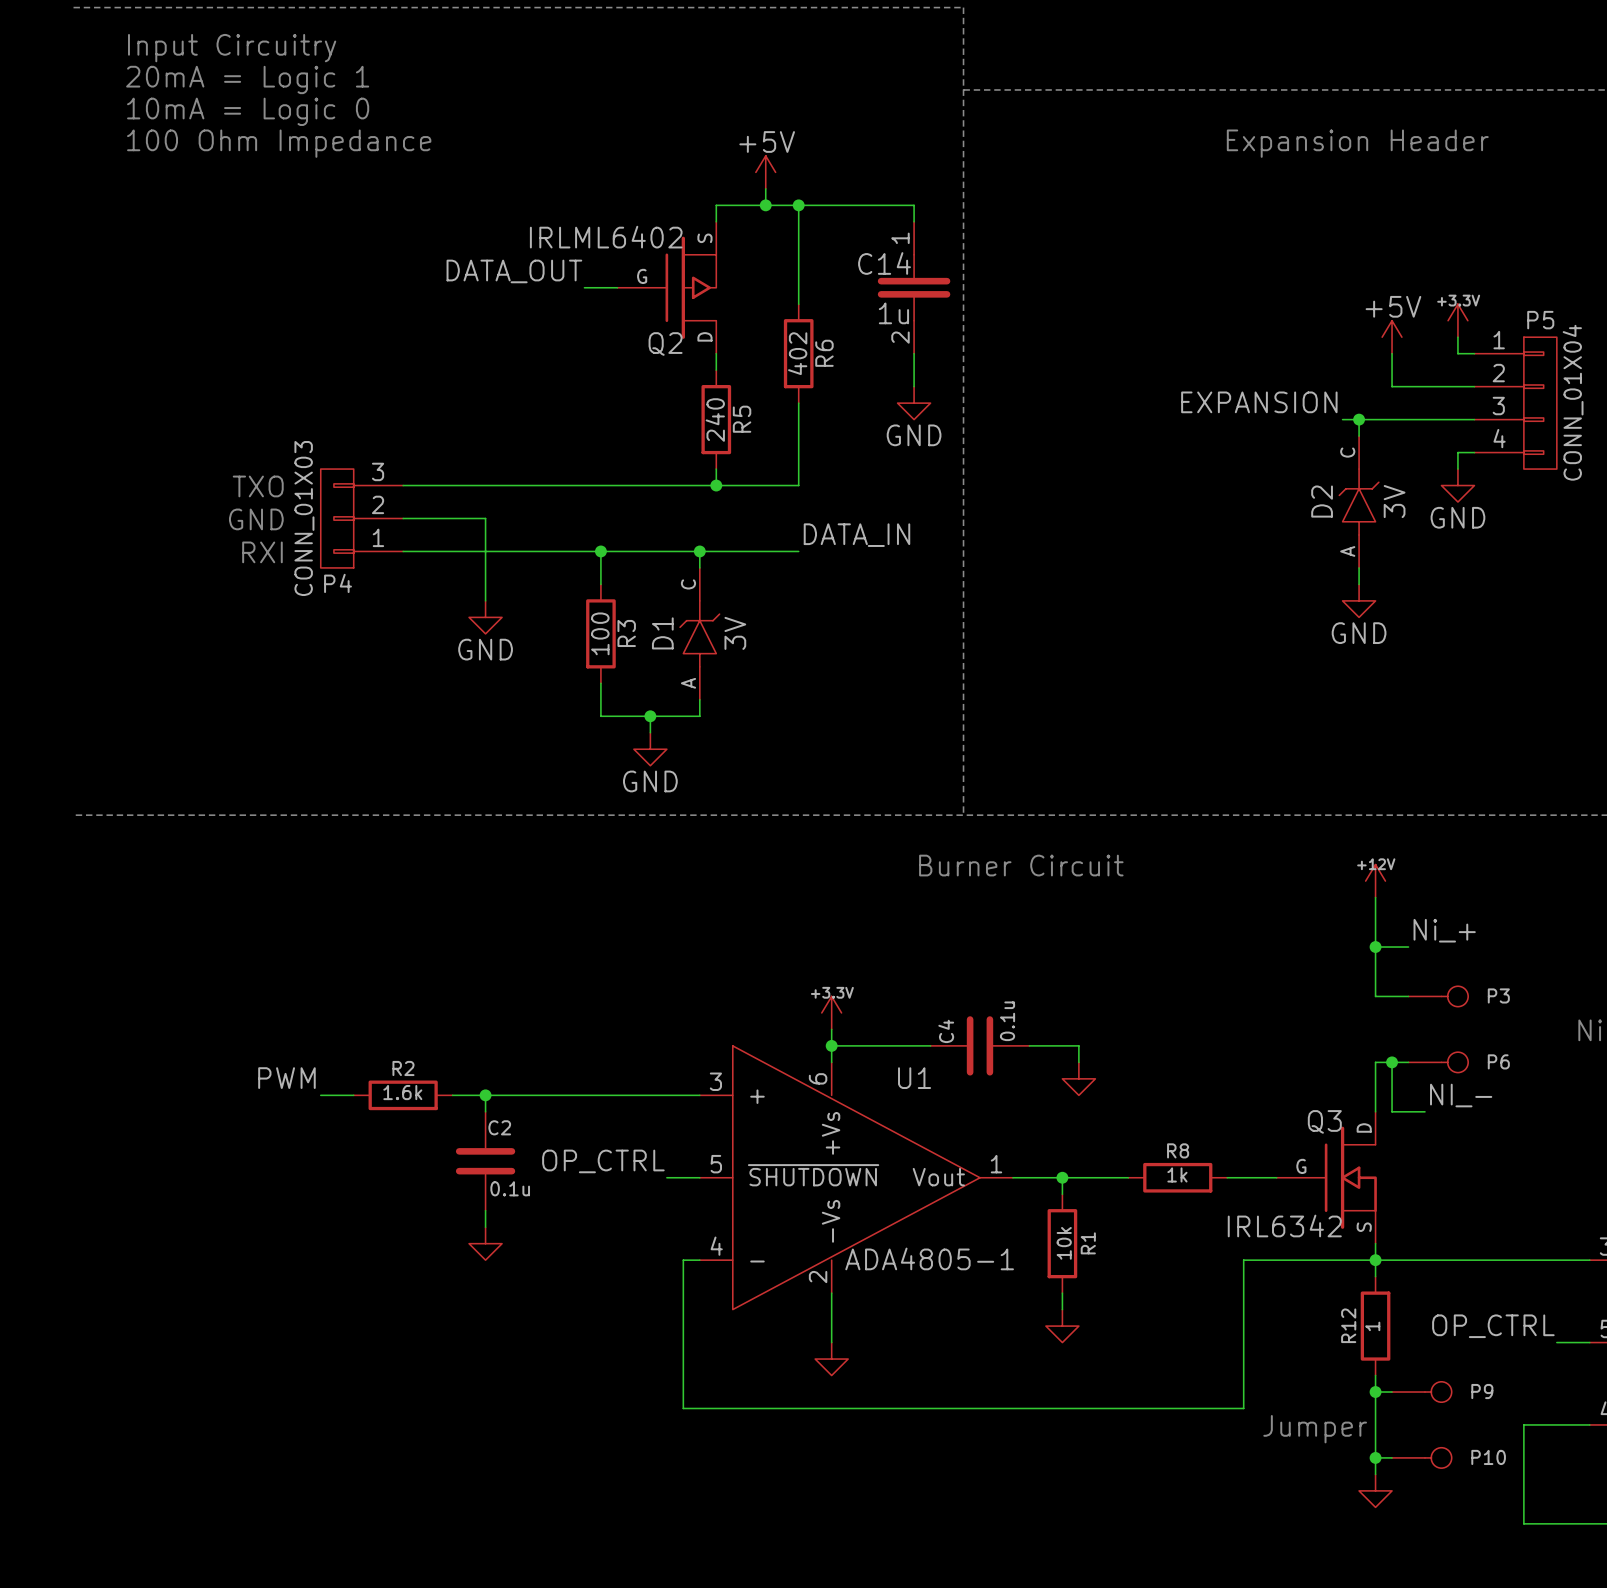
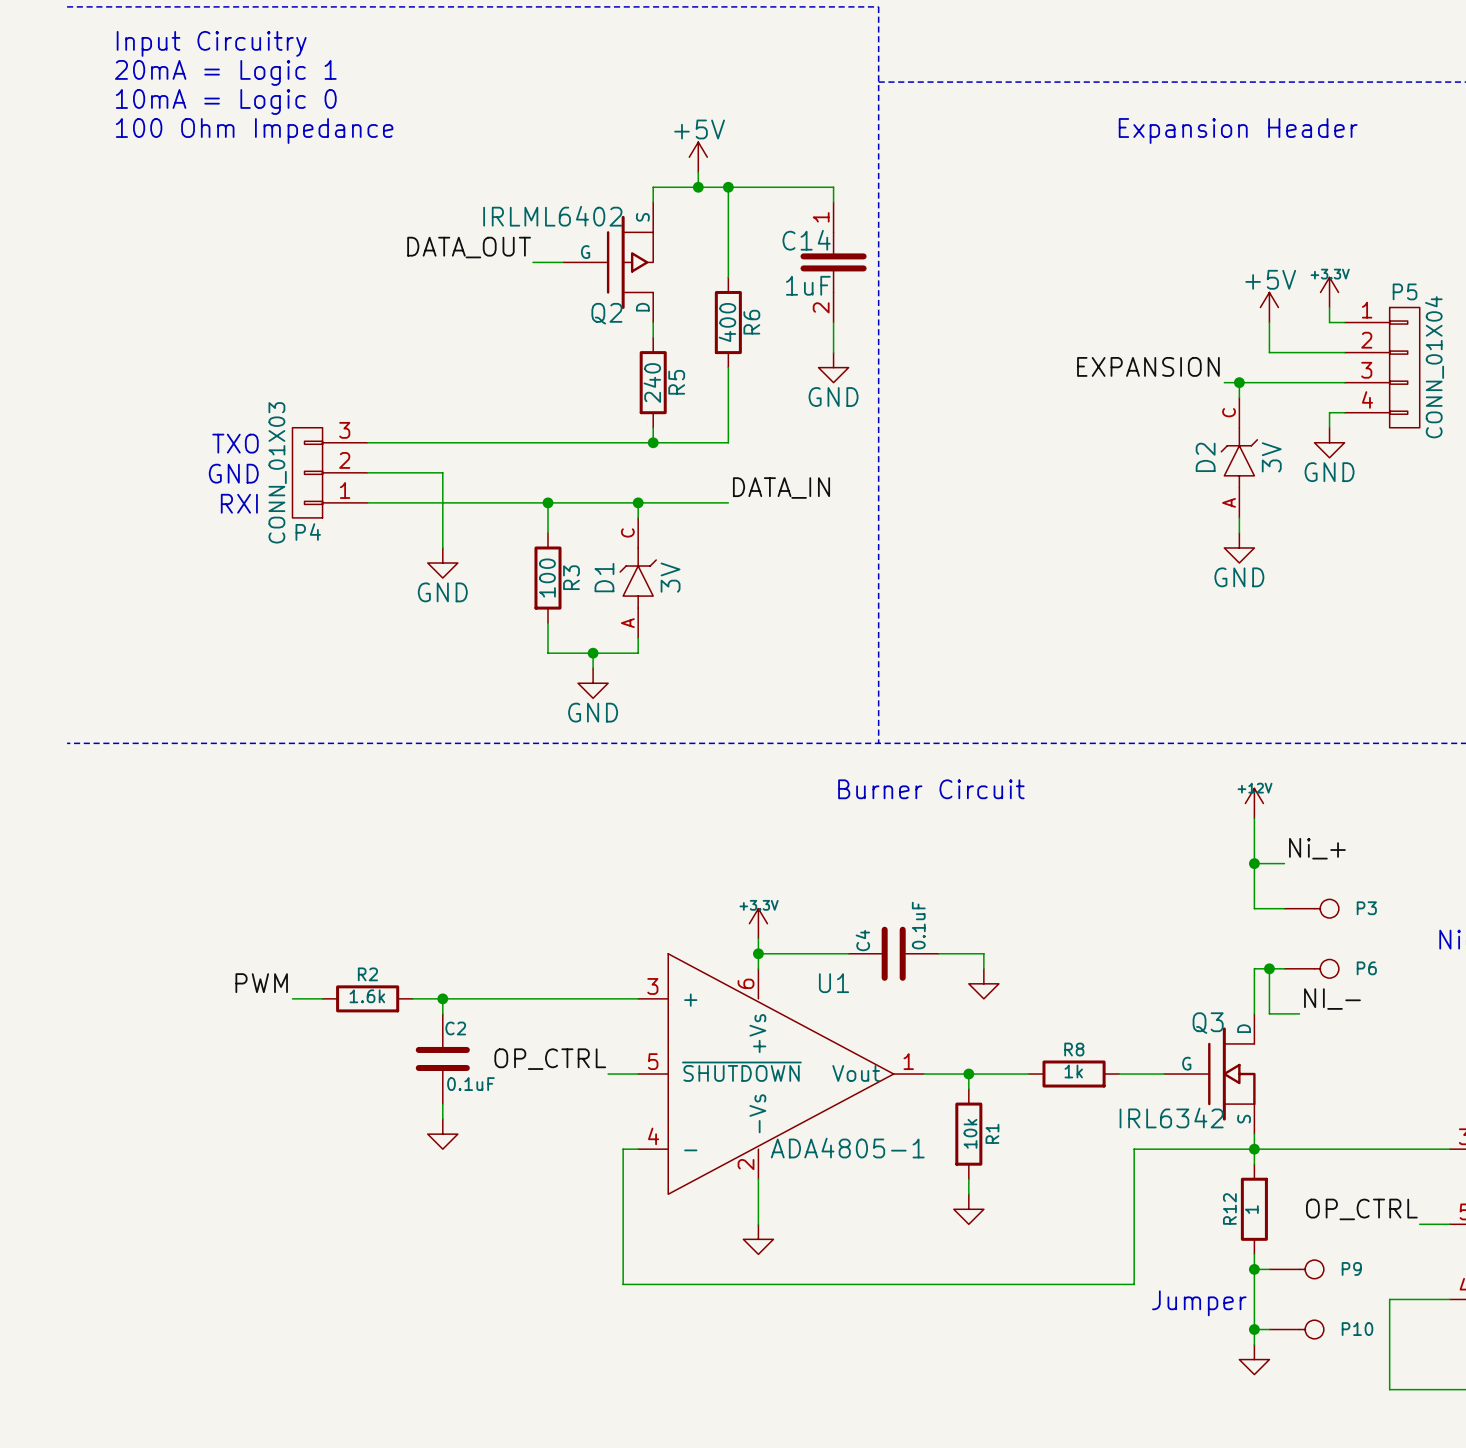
C14 value: 1u (893, 313) -> 1uF (808, 285)
R6 value: 402 (797, 353) -> 400 (727, 322)
C4 value: 0.1u (1007, 1021) -> 0.1uF (918, 925)
C2 value: 0.1u (510, 1188) -> 0.1uF (470, 1084)

